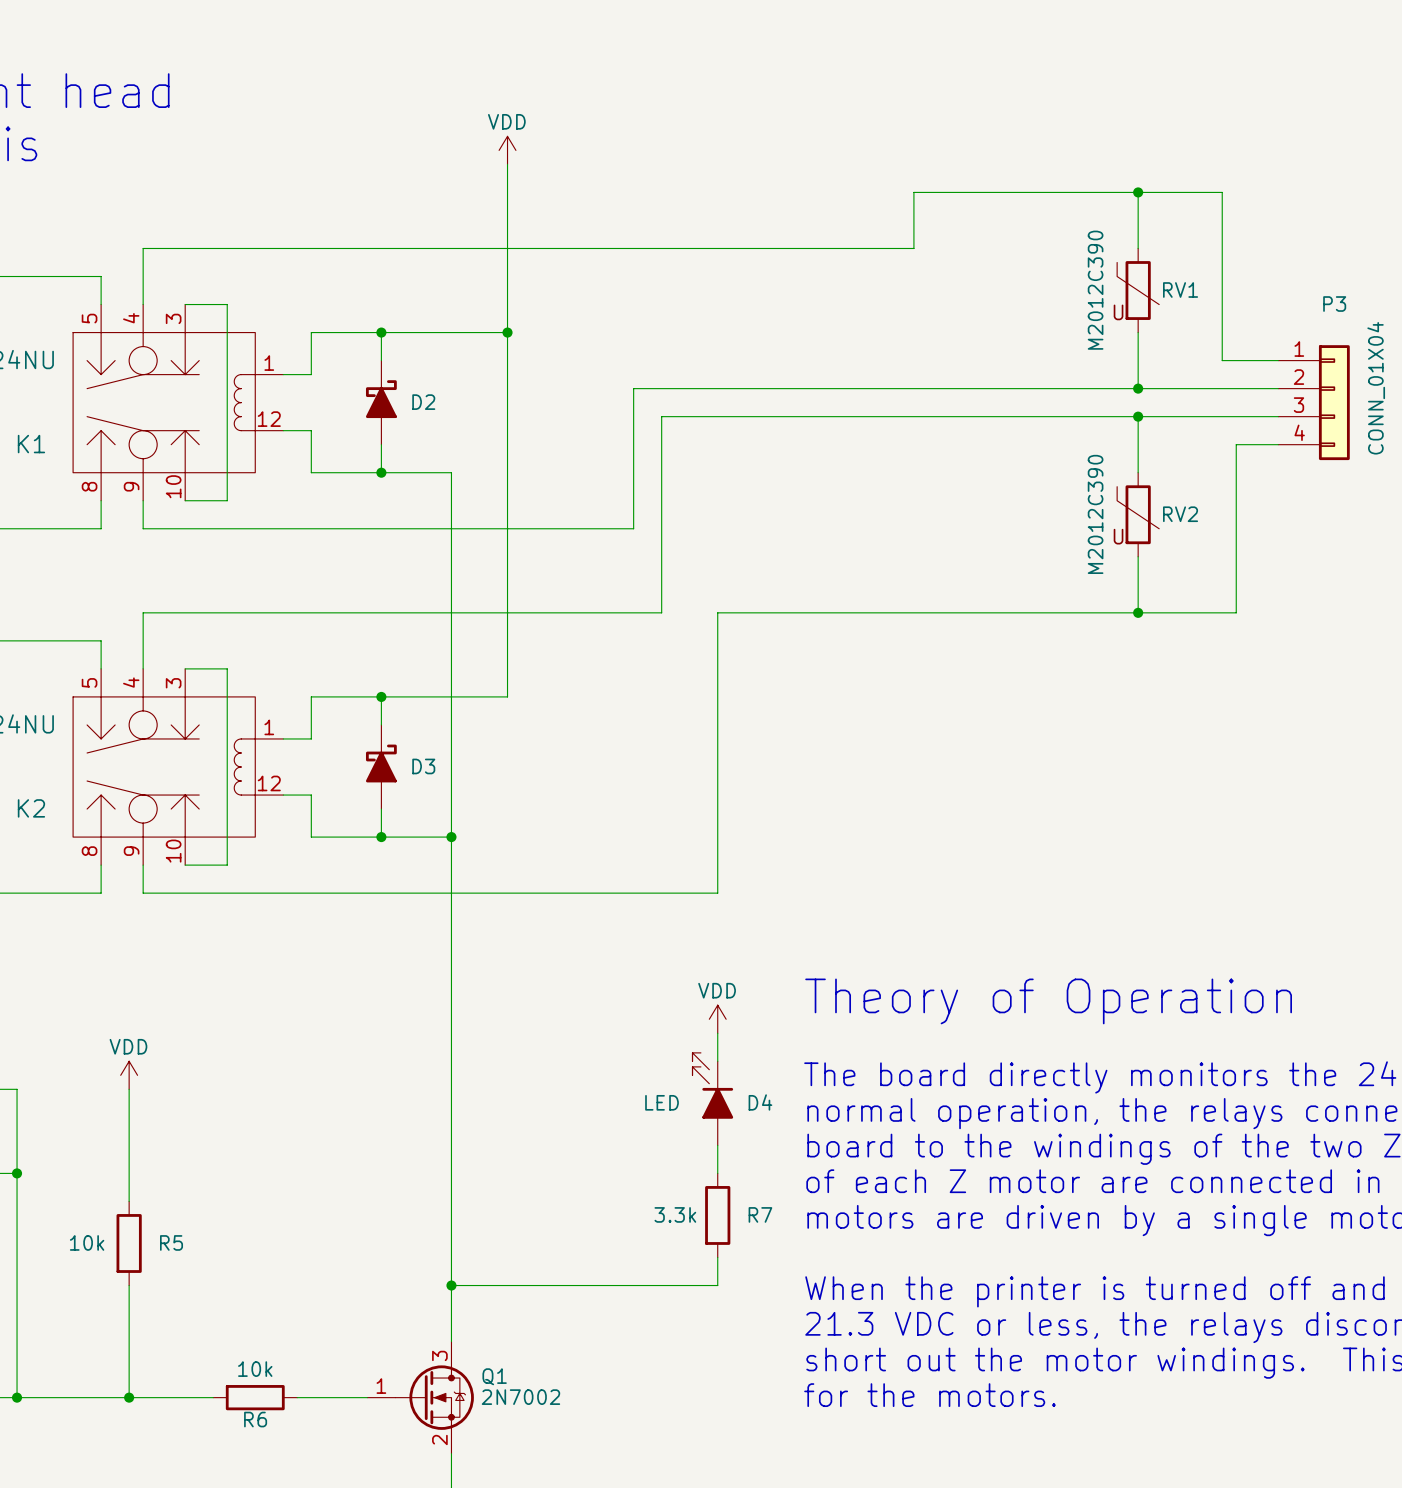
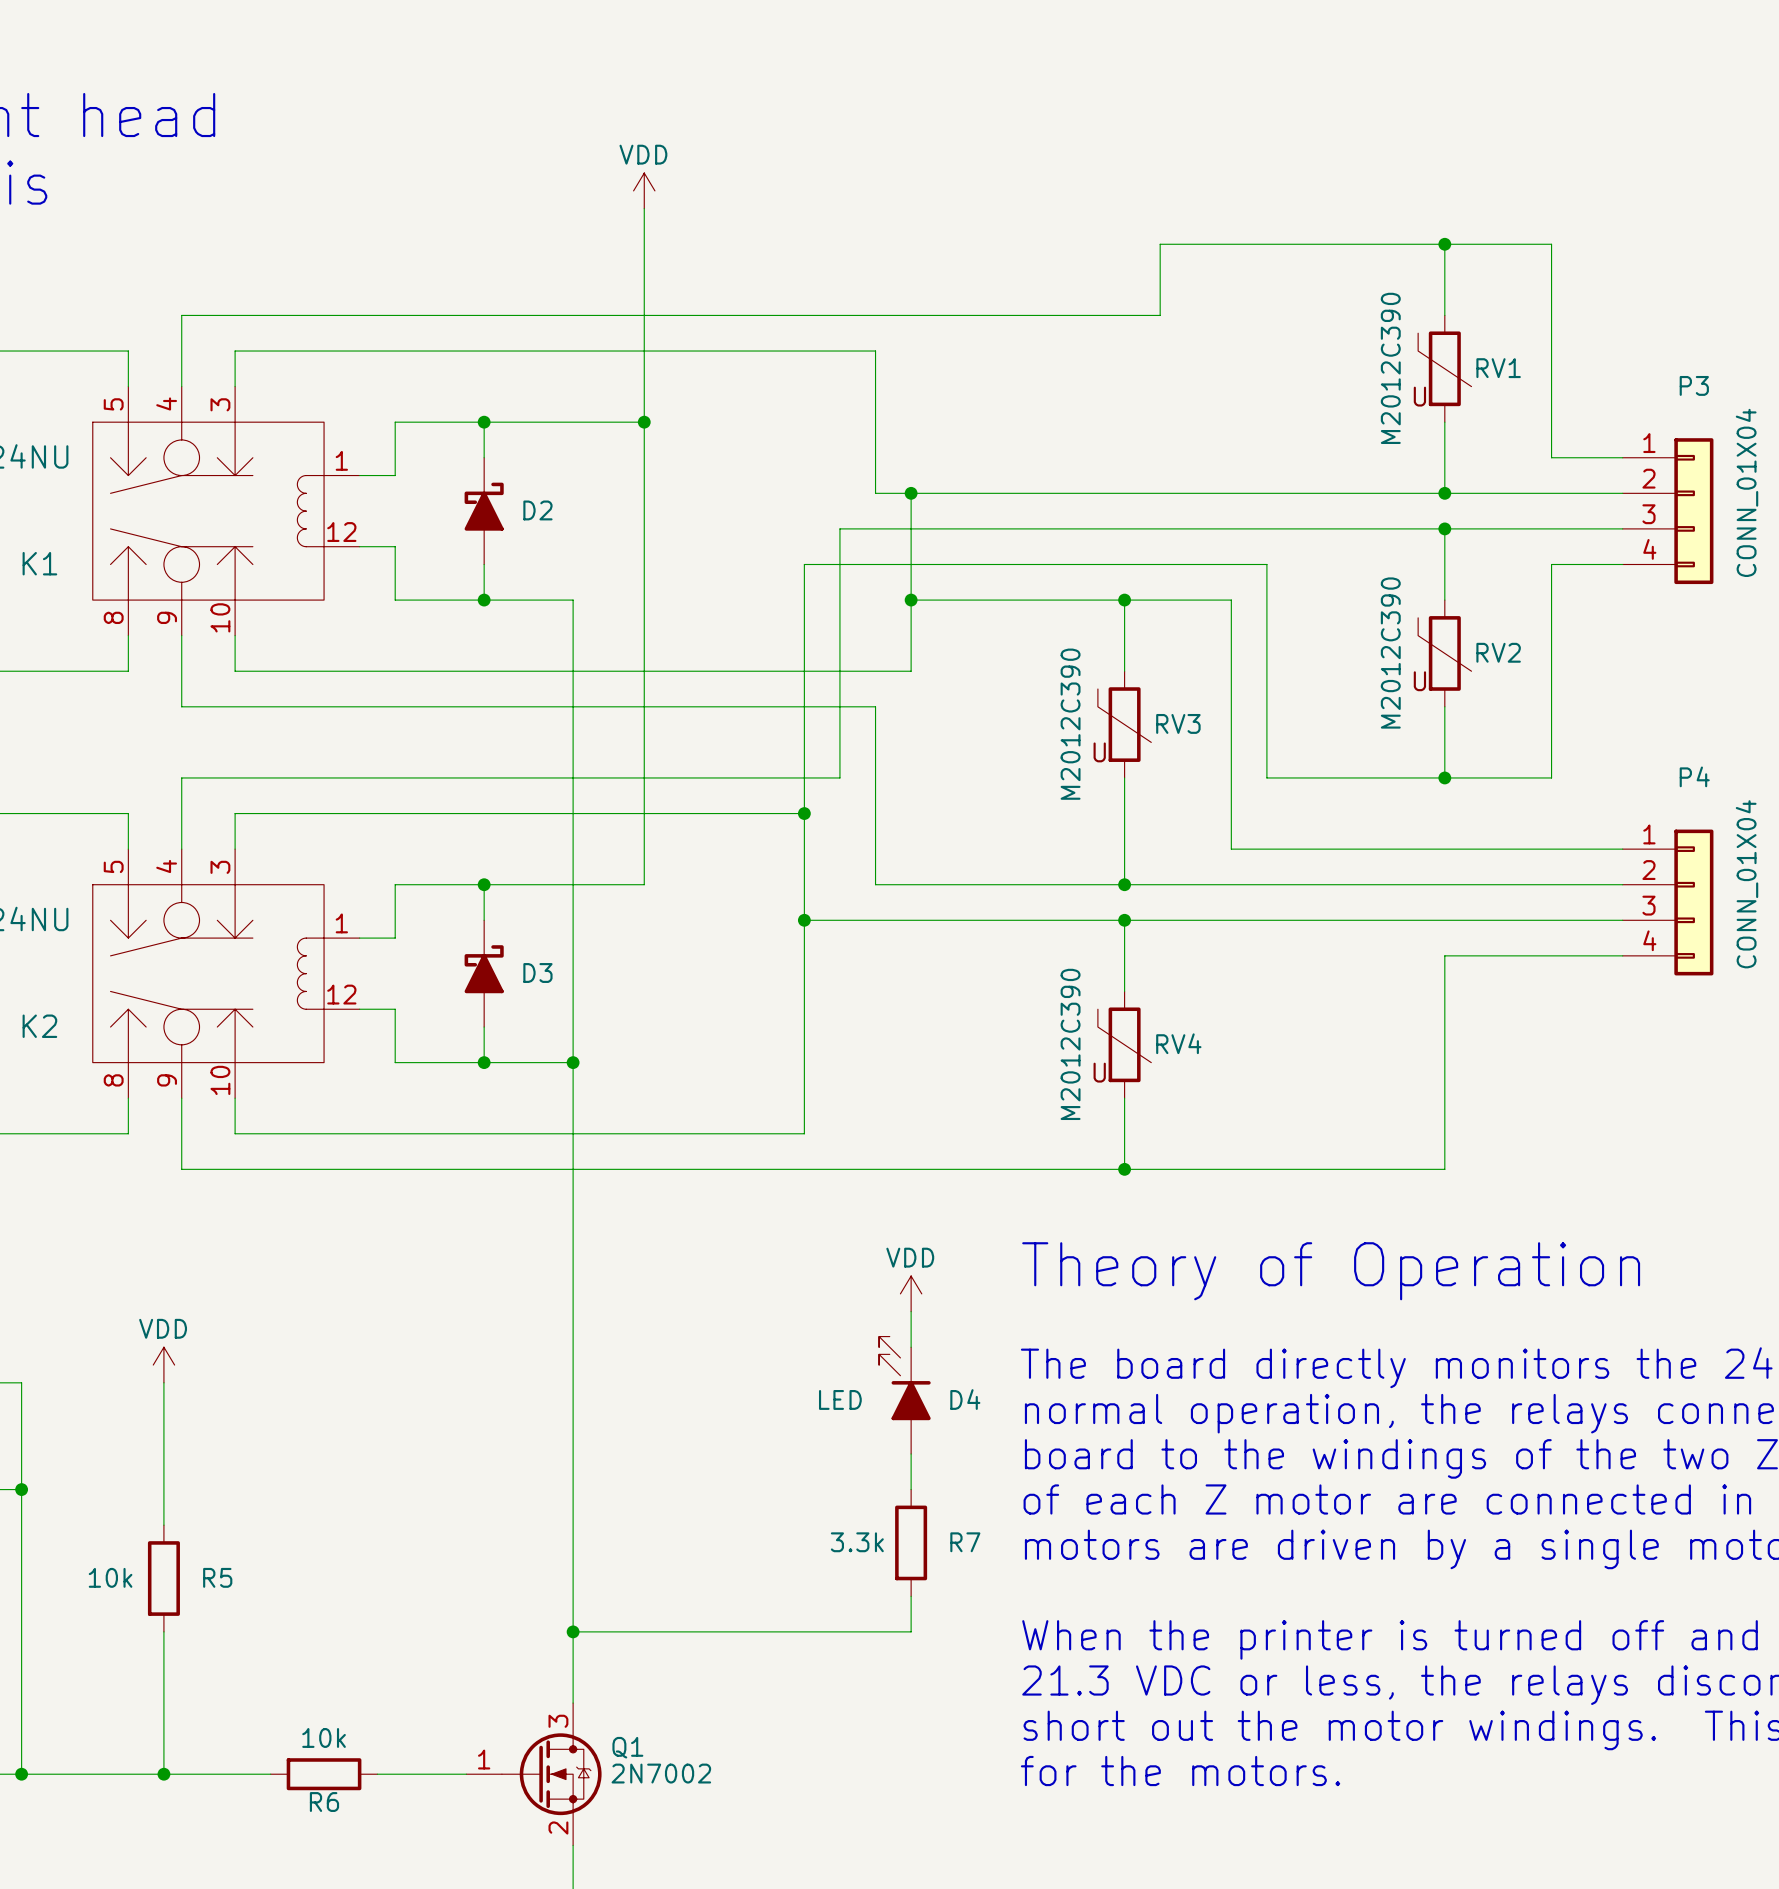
wire: (185, 304) (227, 304) (227, 500) (185, 500) -> (235, 386) (235, 351) (875, 351) (875, 493)
wire: (689, 388) (633, 388) (633, 444) -> (1266, 777) (1266, 564) (804, 564)
junction: none -> (911, 493)
wire: (1236, 444) (1236, 612) (1222, 612) -> (1569, 564) (1551, 564) (1551, 777)
wire: none -> (911, 600) (1231, 600) (1231, 849) (1622, 849)
junction: none -> (911, 600)
wire: none -> (1124, 600) (1124, 671)
junction: none -> (1124, 600)
wire: (143, 528) (185, 528) -> (235, 635) (235, 671)
wire: none -> (181, 671) (181, 706) (875, 706) (875, 884) (1622, 884)
RV3: none -> M2012C390 (1124, 724)
wire: none -> (1124, 777) (1124, 884)
wire: (998, 612) (717, 612) (717, 893) (633, 893) -> (911, 493) (911, 671) (804, 671) (804, 1133)
junction: none -> (804, 813)
wire: (185, 668) (227, 668) (227, 865) (185, 865) -> (235, 849) (235, 813) (804, 813)
junction: none -> (1124, 884)
P4: none -> CONN_01X04 (1668, 902)
wire: none -> (804, 920) (1622, 920)
junction: none -> (804, 920)
wire: none -> (1124, 920) (1124, 991)
junction: none -> (1124, 920)
wire: none -> (1622, 955) (1444, 955) (1444, 1169) (181, 1169) (181, 1133)
RV4: none -> M2012C390 (1124, 1044)
wire: none -> (1124, 1098) (1124, 1169)
wire: (143, 893) (185, 893) -> (235, 1098) (235, 1133)
junction: none -> (1124, 1169)

